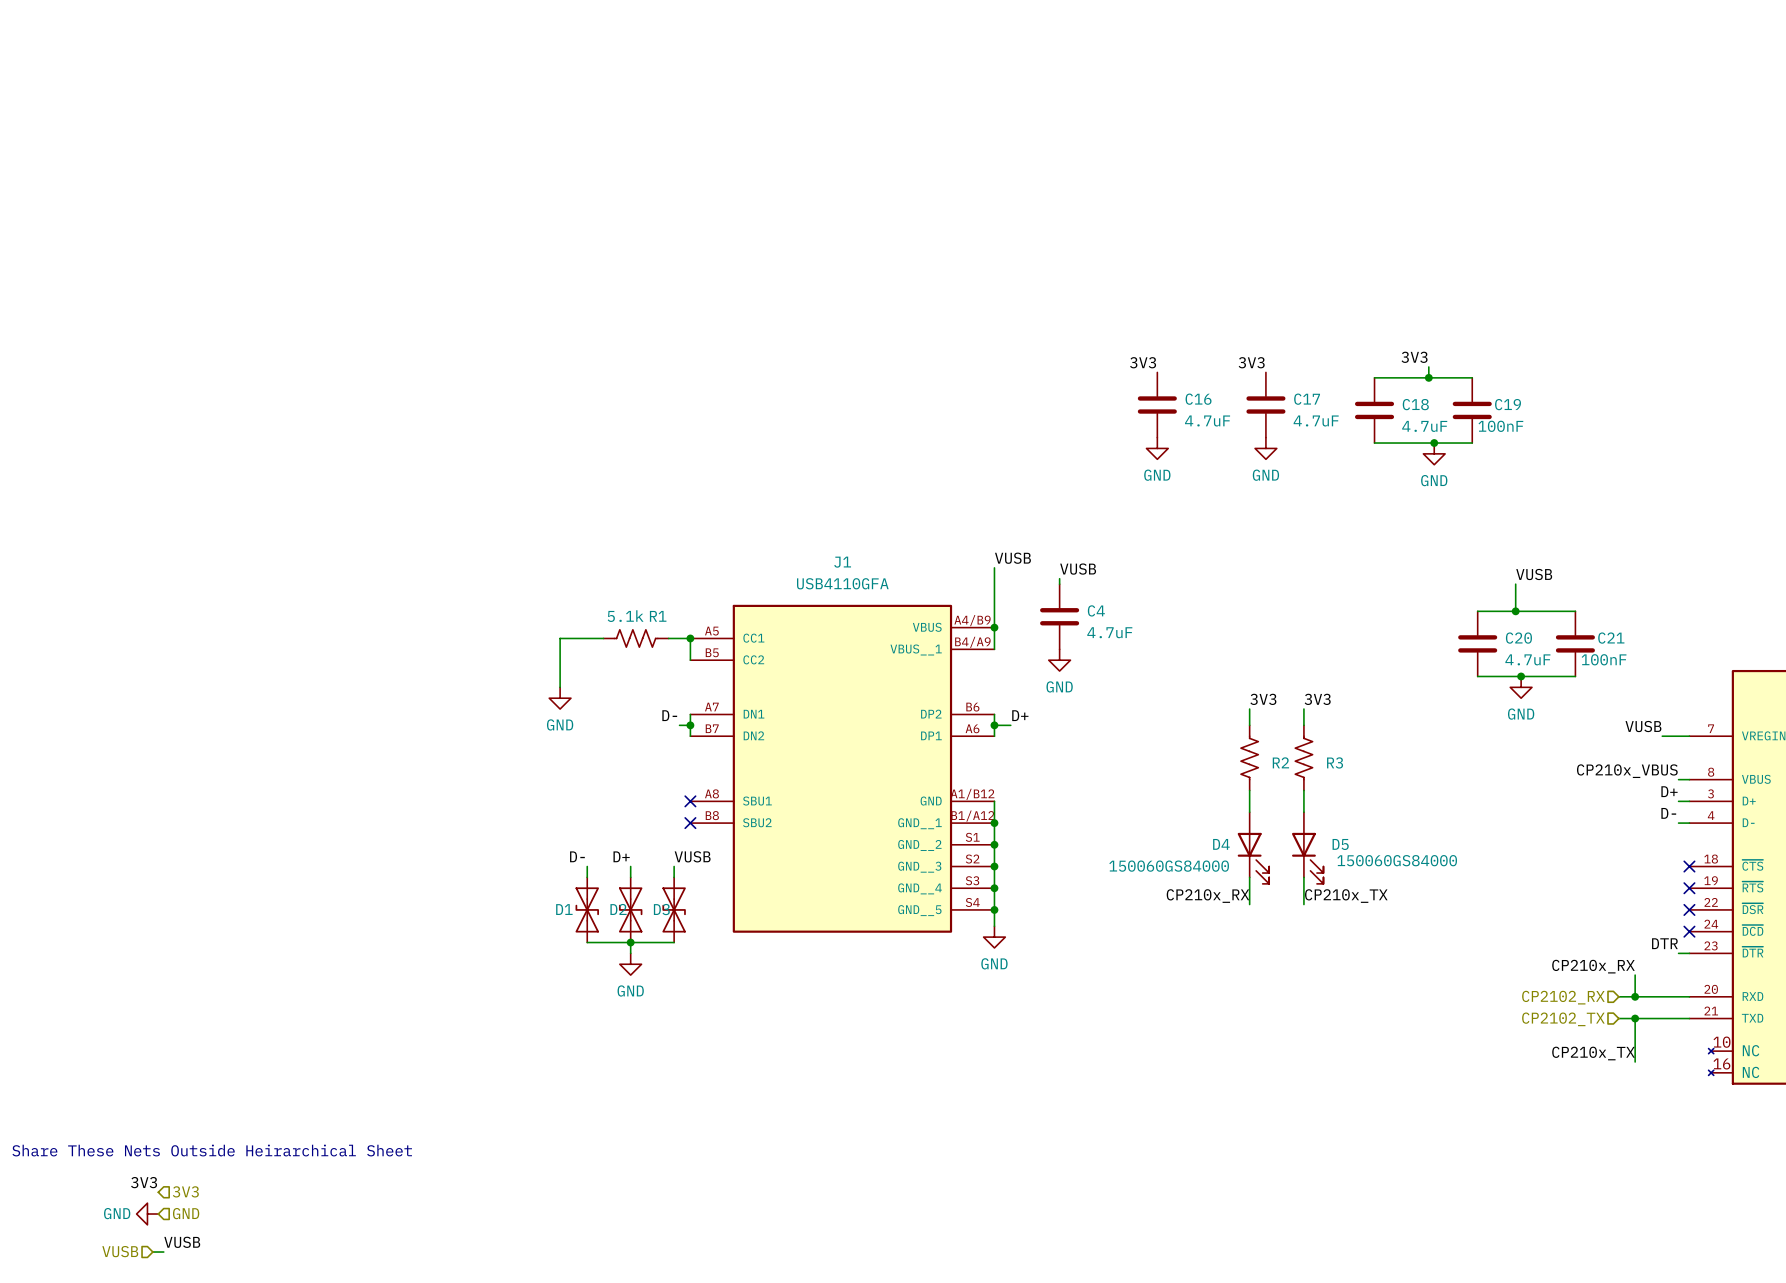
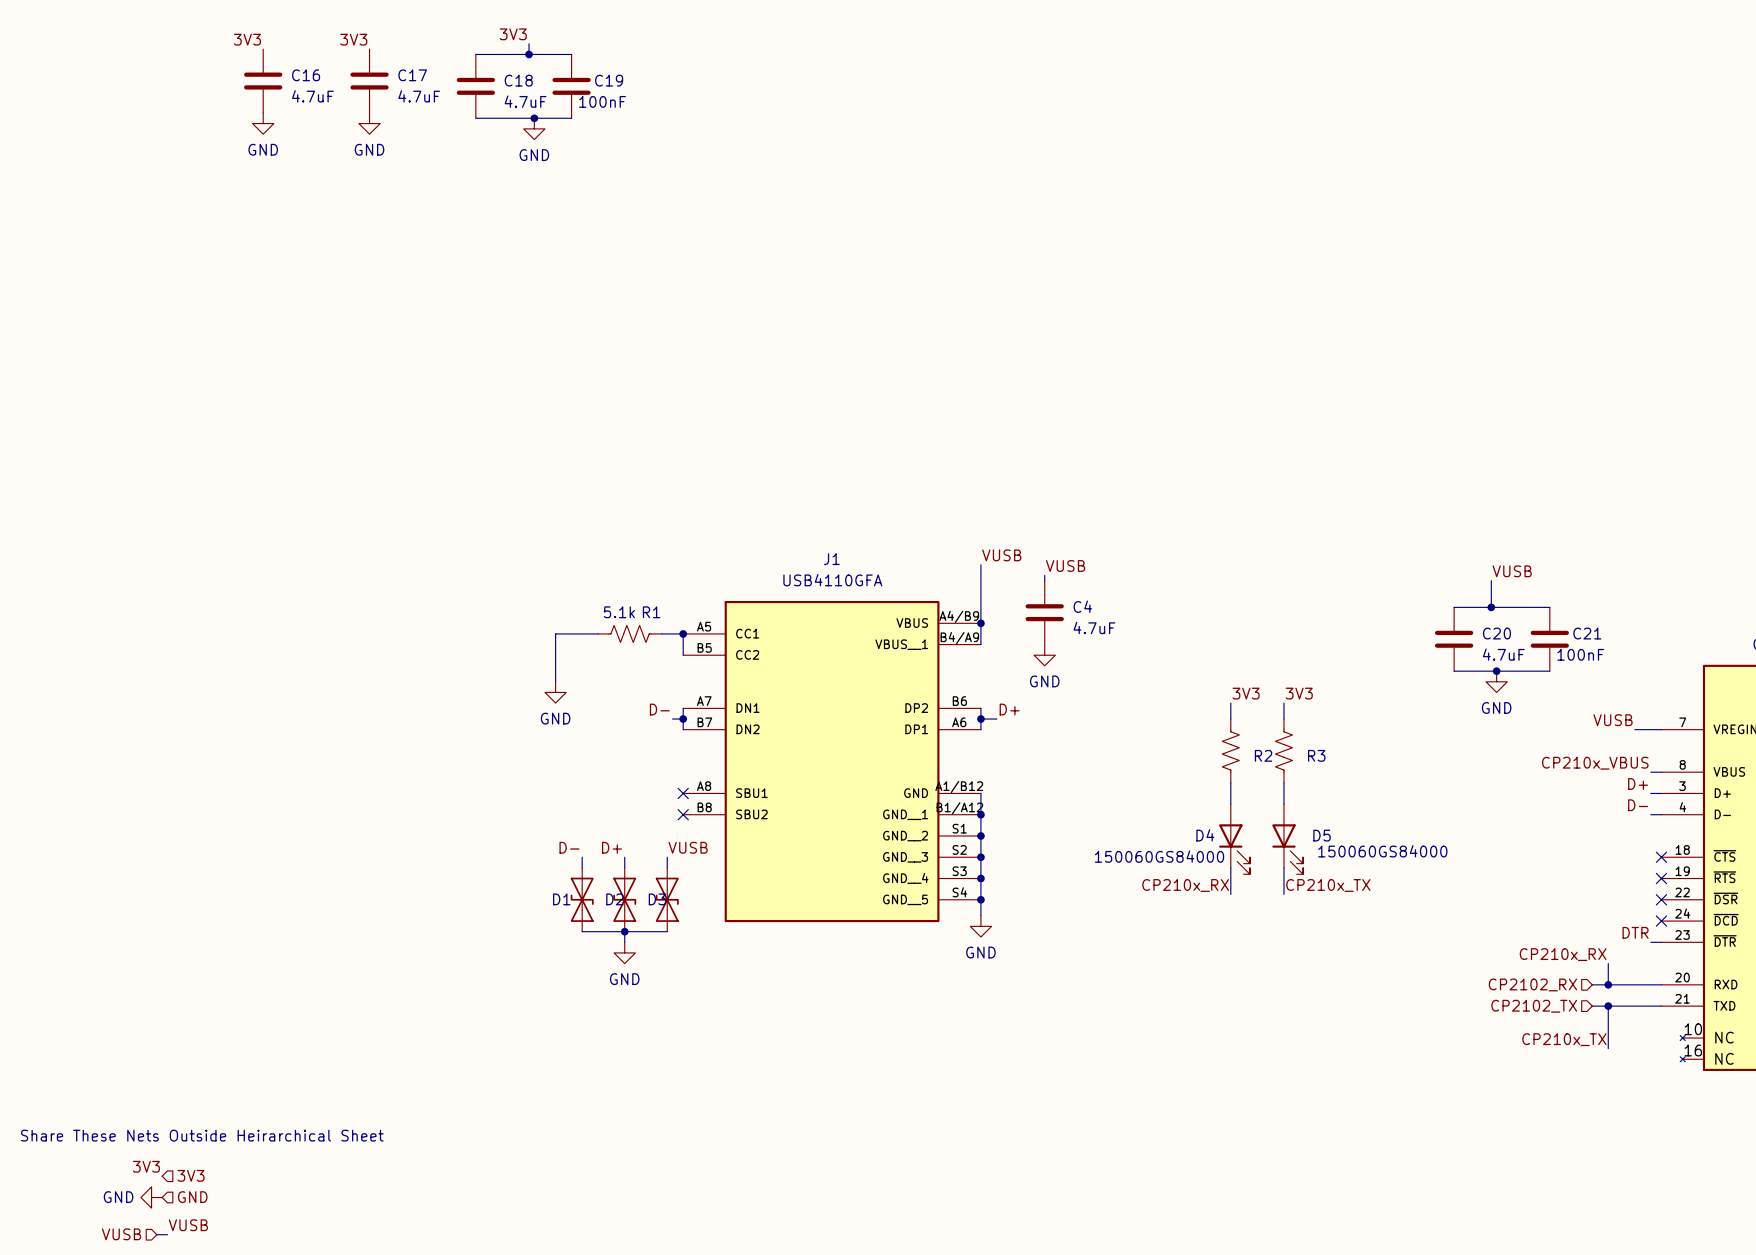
label: none -> 3V3 (513, 34)
label: none -> 3V3 (247, 39)
label: none -> 3V3 (353, 39)
wire: none -> (529, 43) (529, 54)
wire: none -> (475, 54) (571, 54)
junction: none -> (529, 54)
wire: none -> (475, 118) (571, 118)
junction: none -> (534, 118)
power symbol: none -> GND (263, 123)
power symbol: none -> GND (369, 123)
power symbol: none -> GND (534, 128)
label: 3V3 (1414, 357) -> none
label: 3V3 (1143, 362) -> none
label: 3V3 (1251, 362) -> none
wire: (1428, 367) (1428, 377) -> none
wire: (1374, 377) (1472, 377) -> none
junction: (1428, 377) -> none
C16 position: (1157, 405) -> (263, 81)
C17 position: (1265, 405) -> (369, 81)
C18 position: (1374, 410) -> (475, 86)
C19 position: (1472, 410) -> (571, 86)
wire: (1374, 443) (1472, 443) -> none
junction: (1434, 443) -> none
power symbol: GND (1157, 448) -> none
power symbol: GND (1265, 448) -> none
power symbol: GND (1434, 453) -> none

